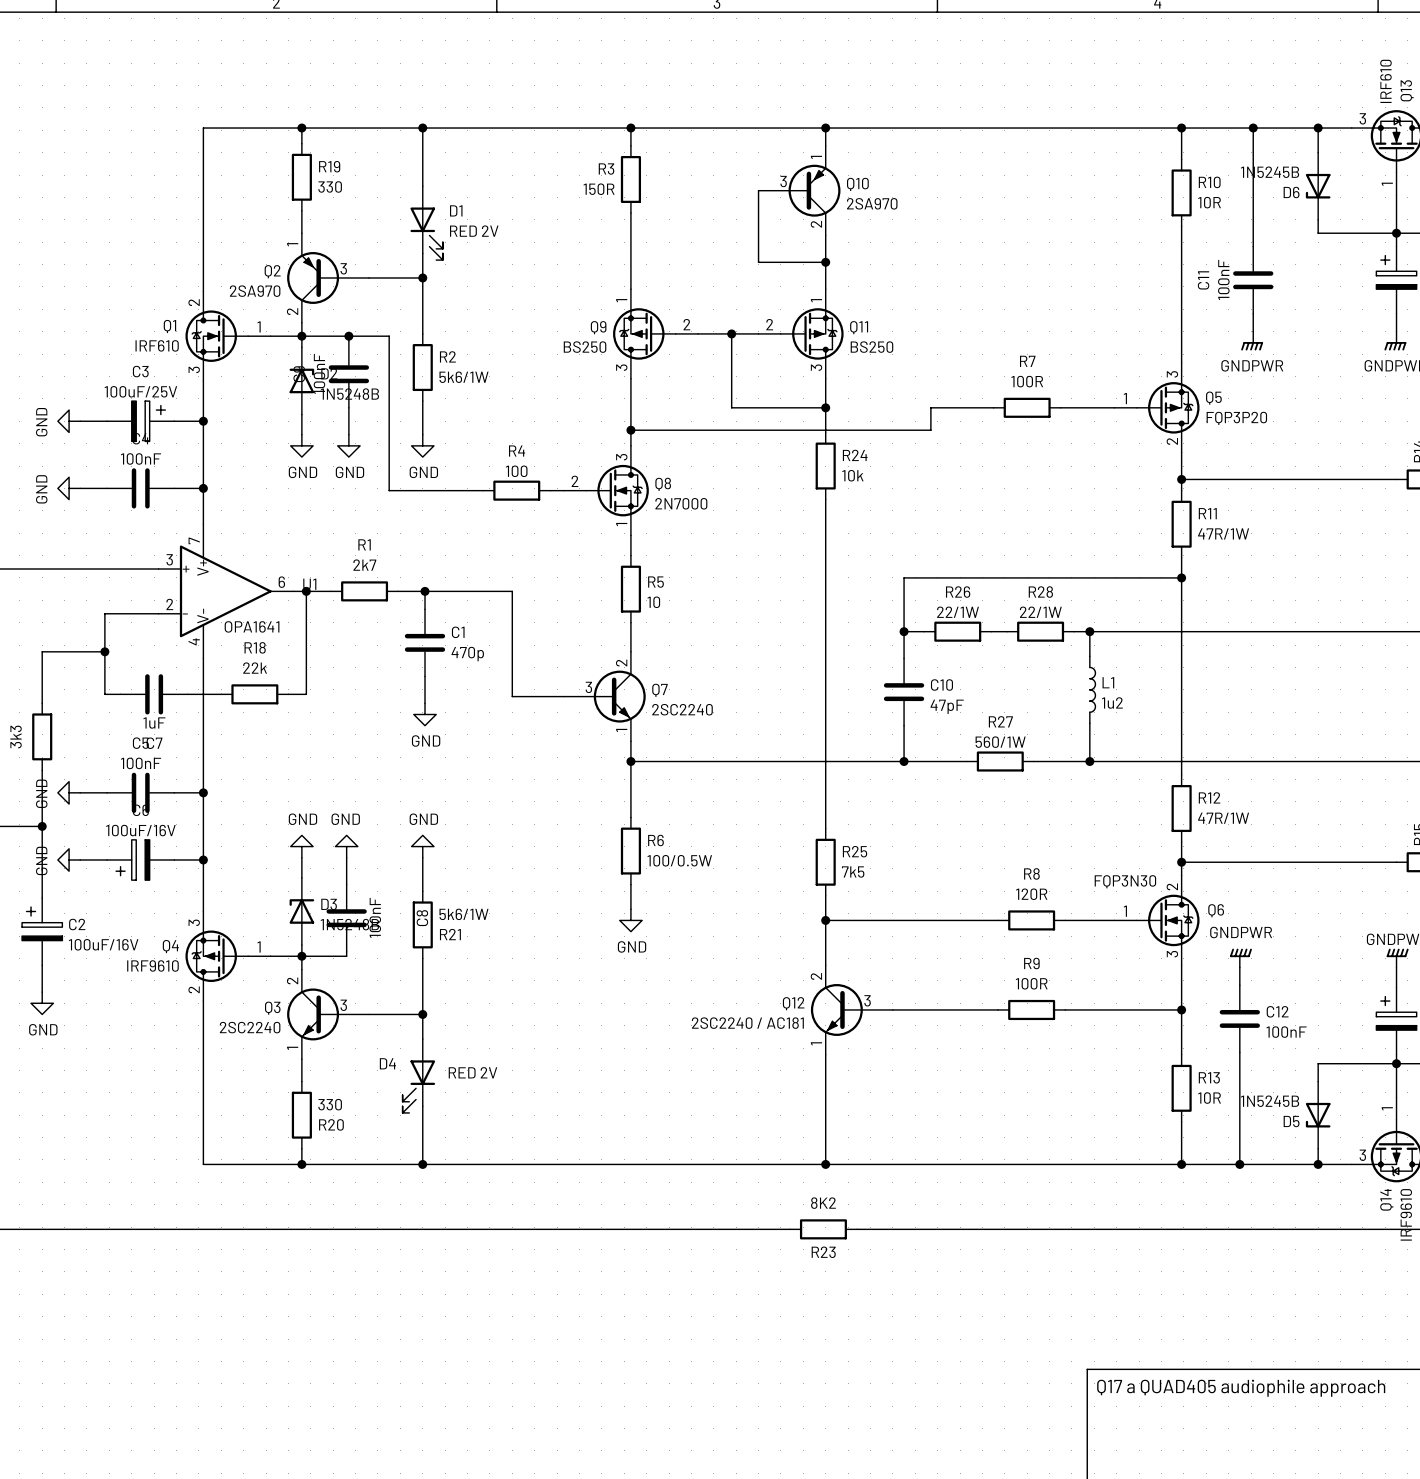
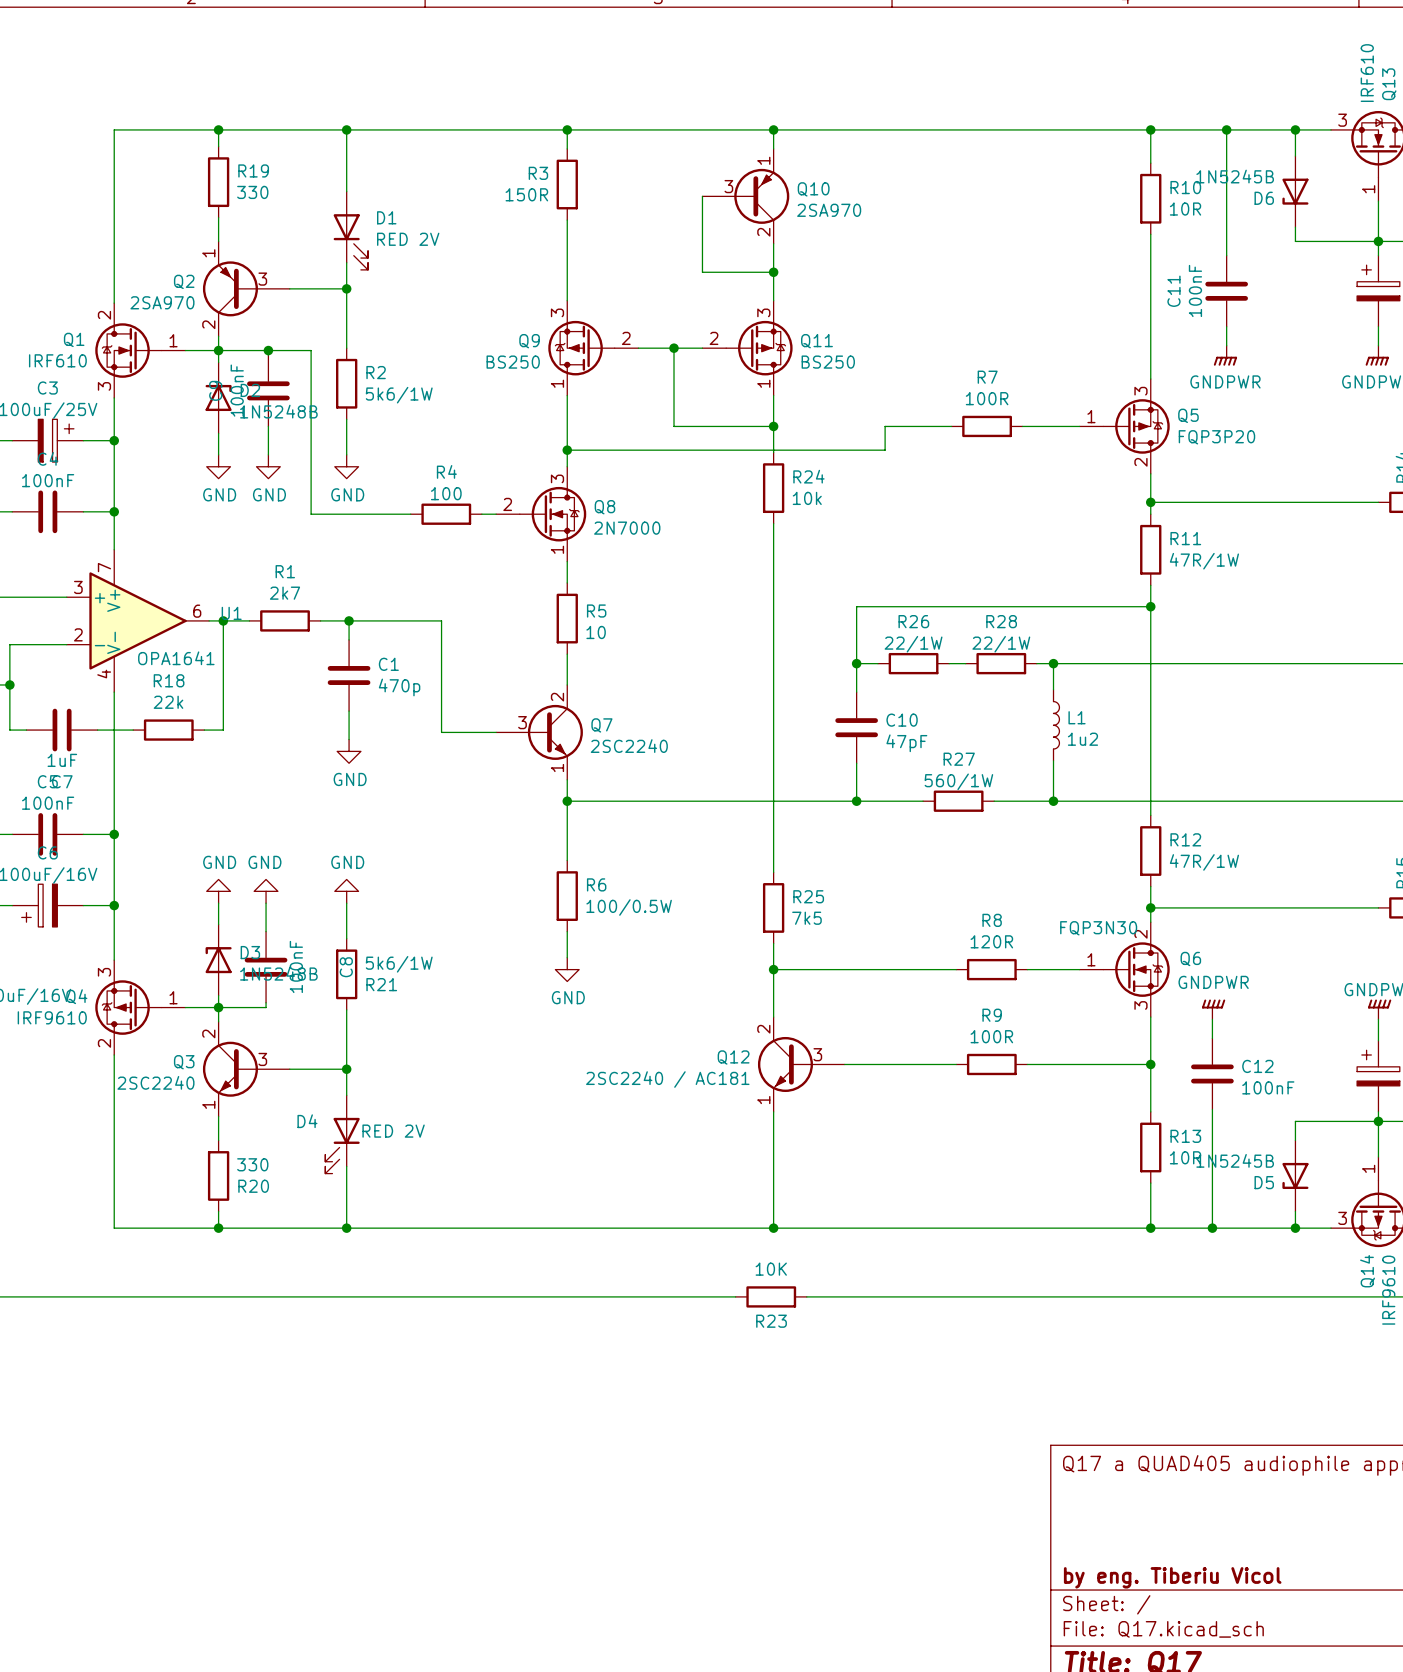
Q9 pin number: 1 (621, 300) -> 3 (557, 312)
Q11 pin number: 1 (816, 300) -> 3 (763, 312)
Q9 pin number: 3 (621, 367) -> 1 (557, 383)
Q11 pin number: 3 (816, 367) -> 1 (763, 383)
R23 value: 8K2 (823, 1203) -> 10K (771, 1269)

